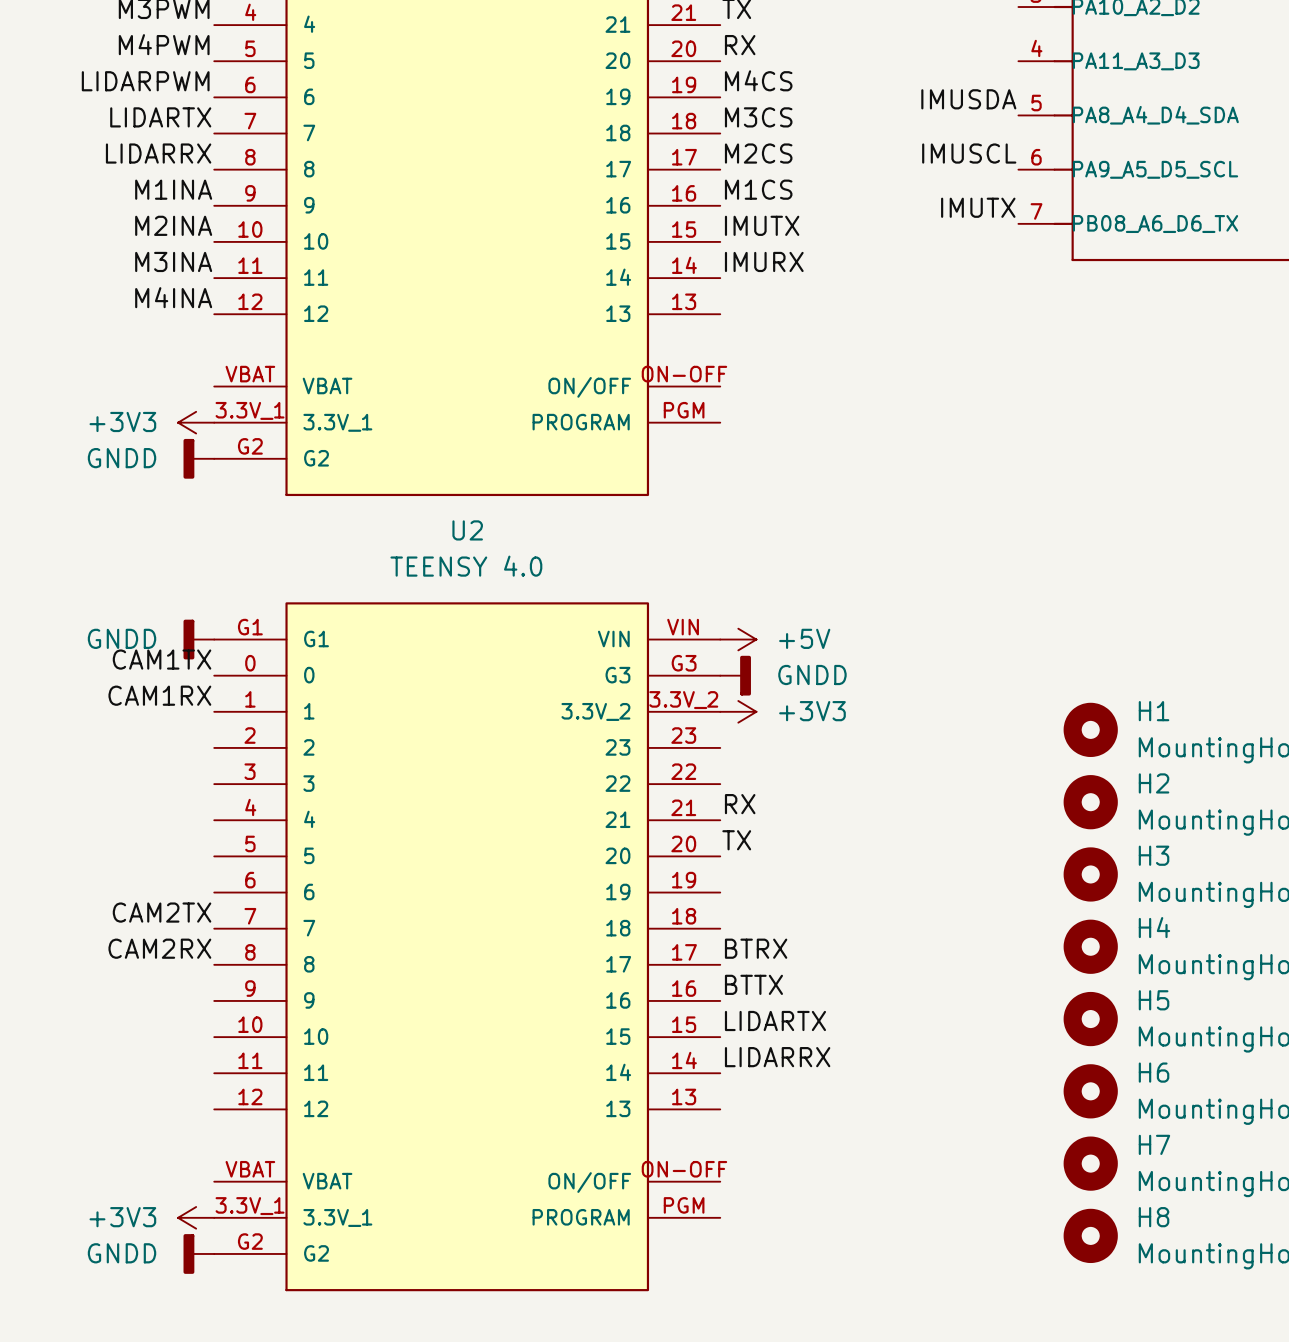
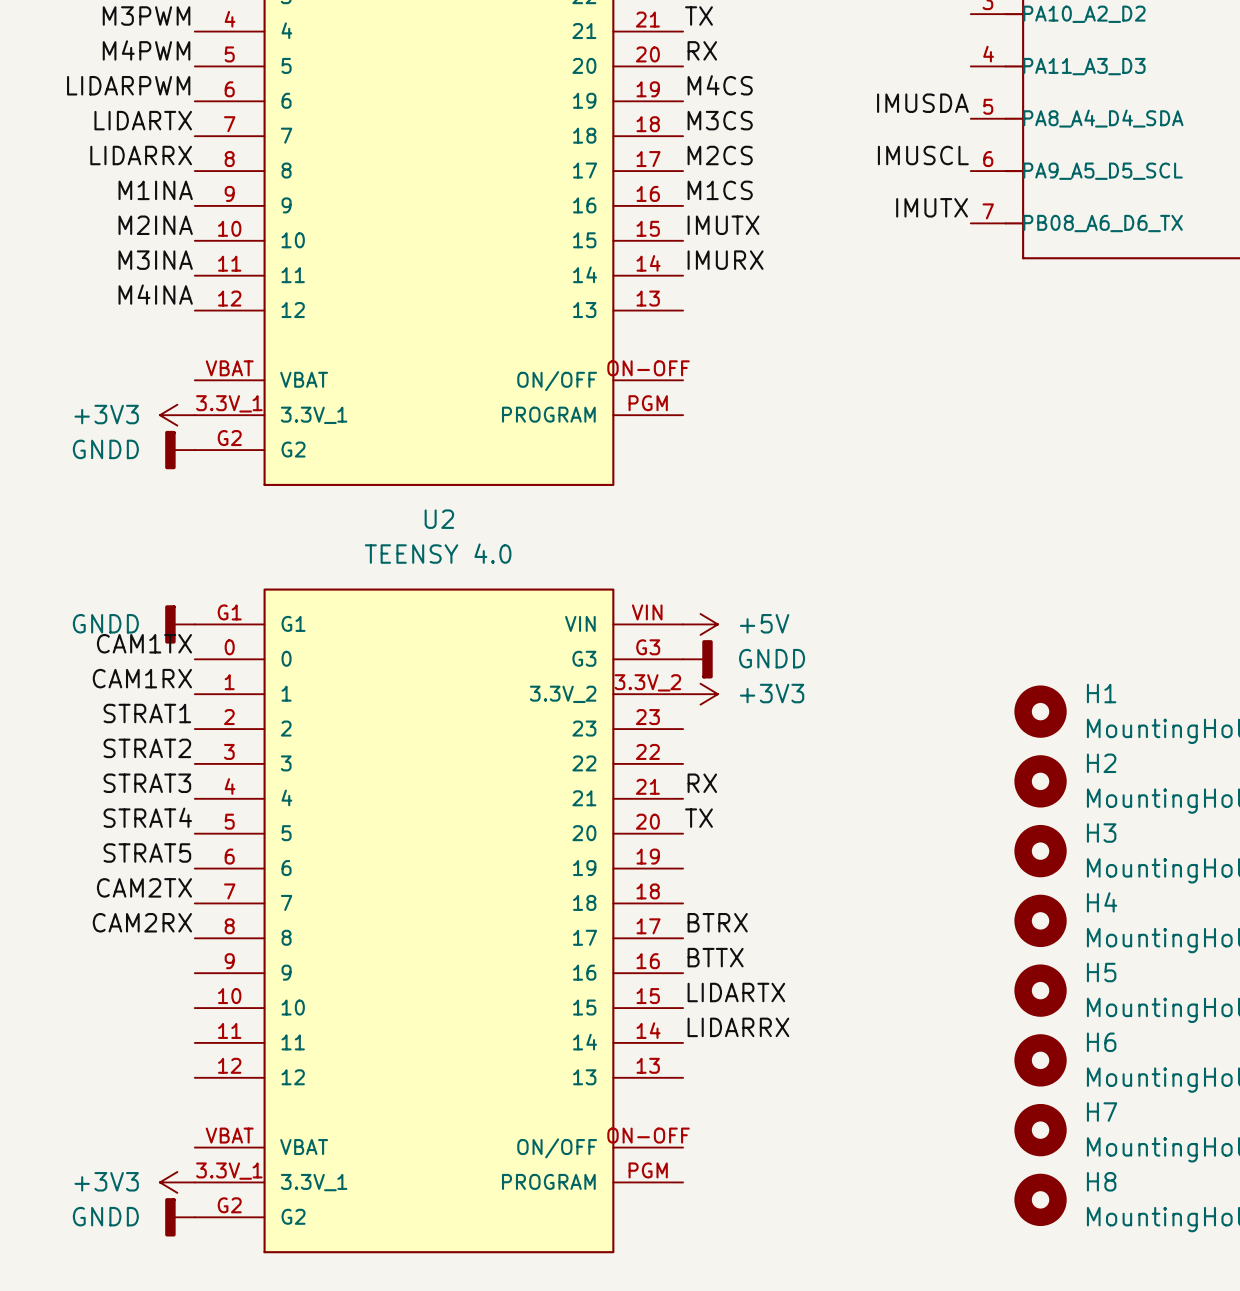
label: none -> STRAT1 (147, 713)
label: none -> STRAT2 (147, 748)
label: none -> STRAT3 (147, 783)
label: none -> STRAT4 (147, 817)
label: none -> STRAT5 (147, 853)

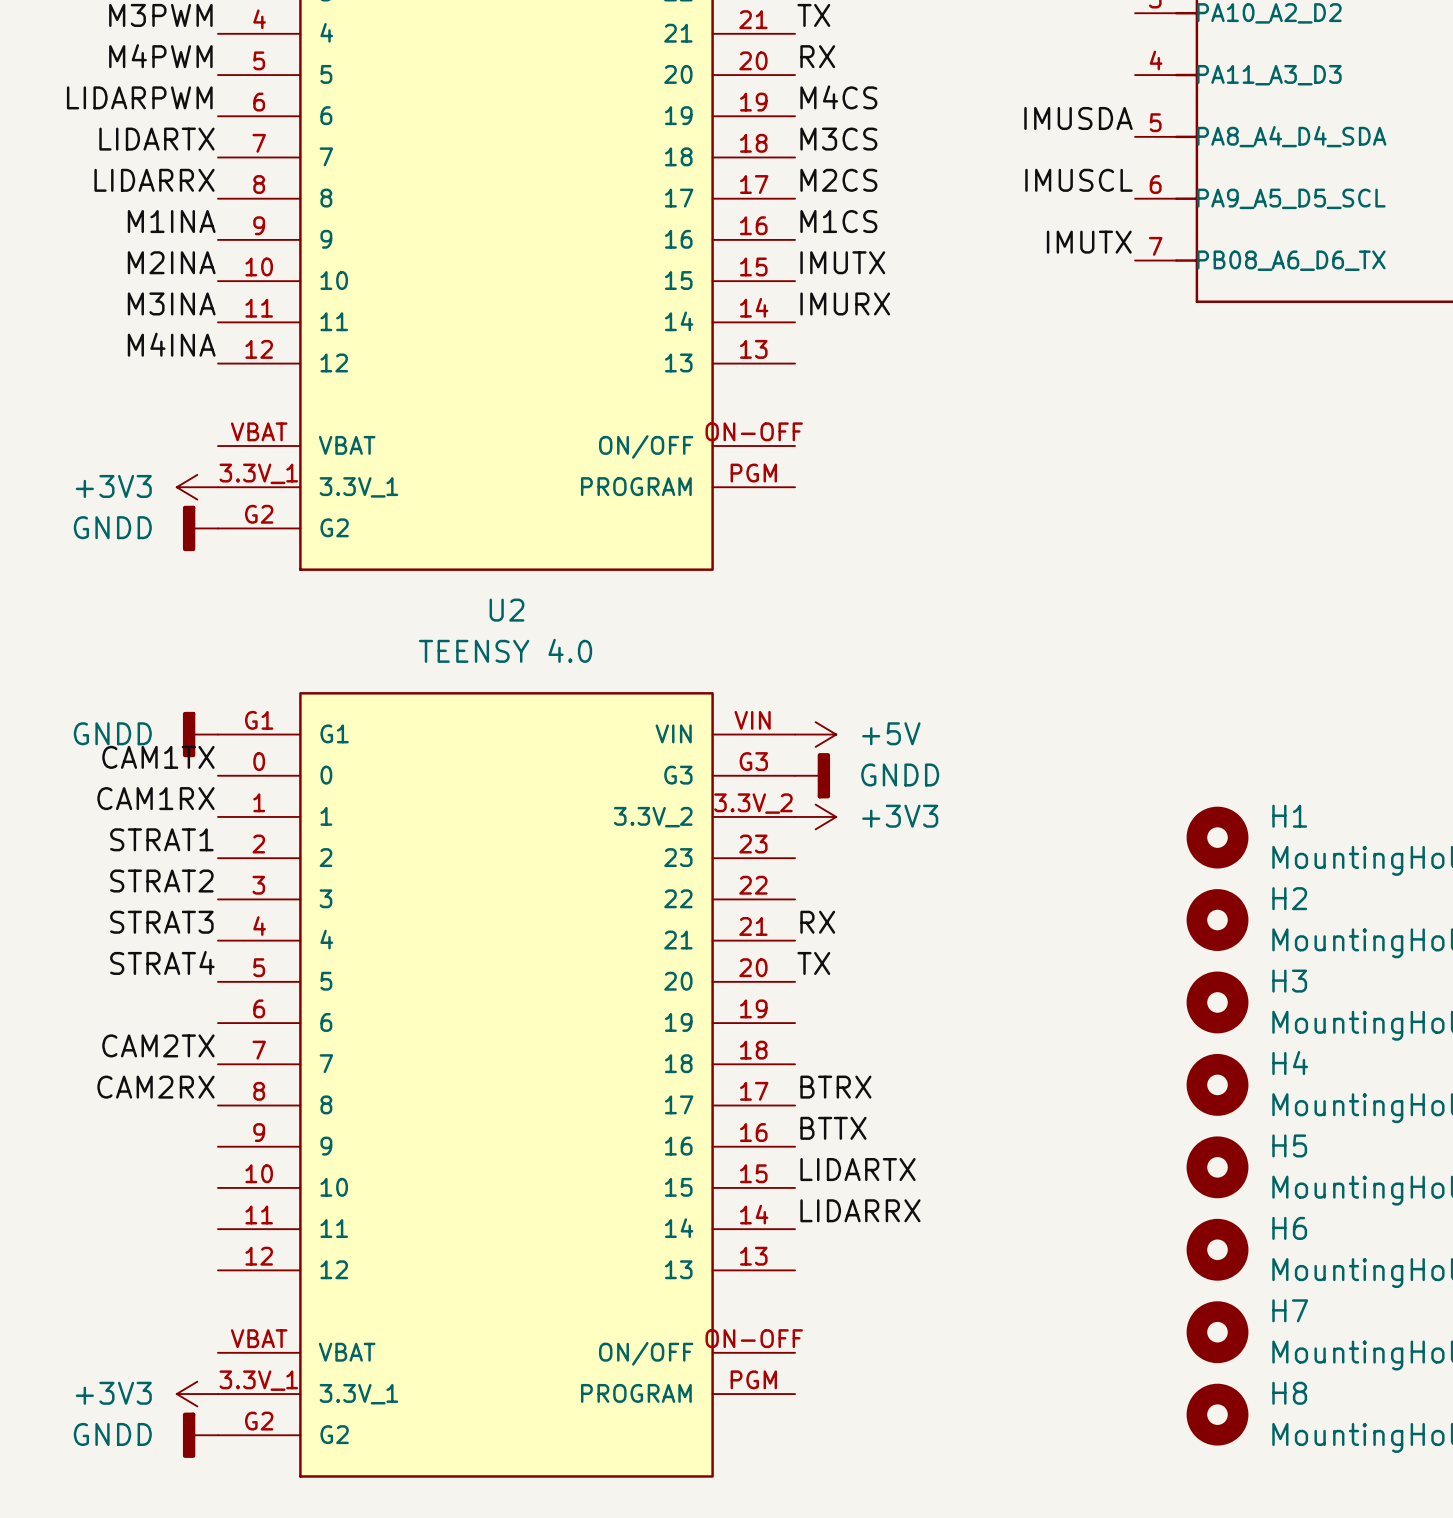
label: STRAT5 (147, 853) -> none

